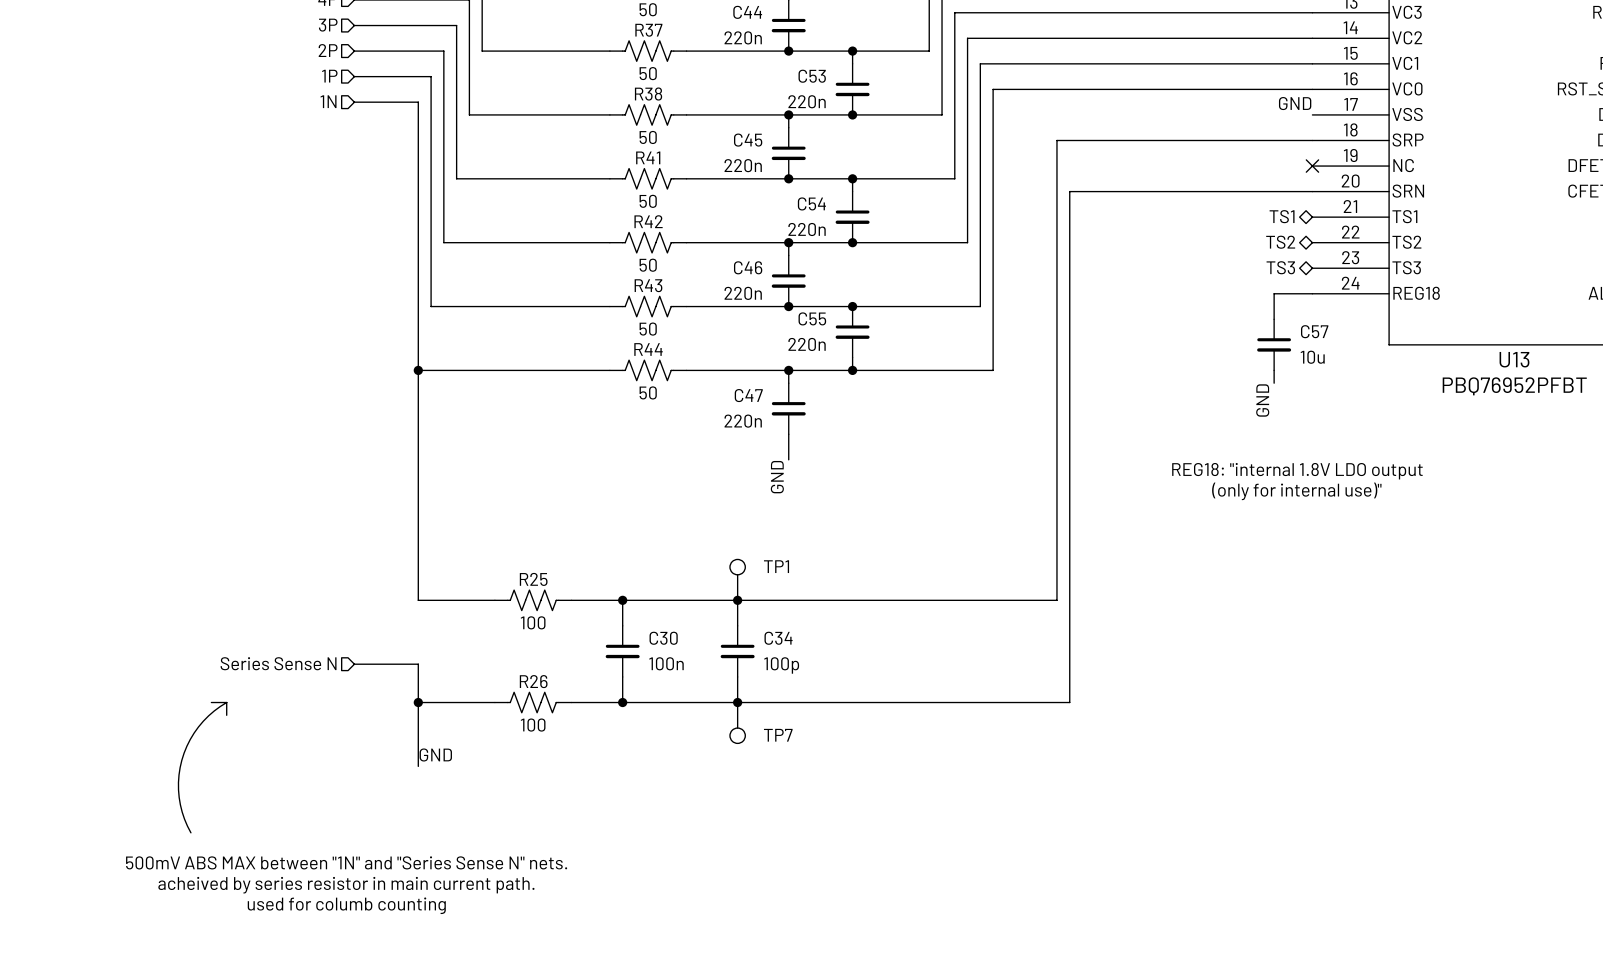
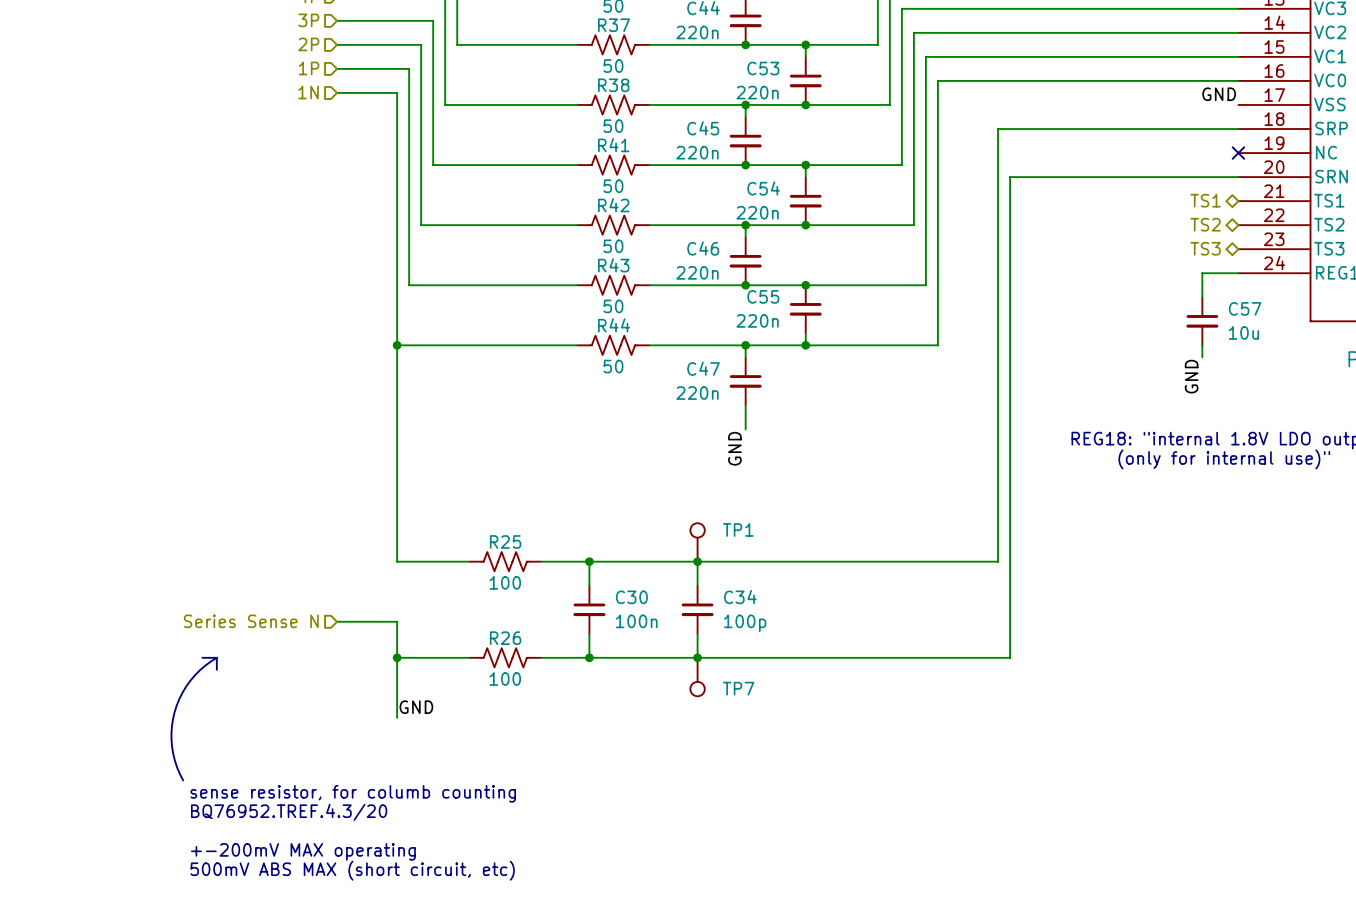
text: none -> sense resistor, for columb counting (353, 793)
text: 500mV ABS MAX between "1N" and "Series Sense N" nets. (346, 862) -> none
text: none -> BQ76952.TREF.4.3/20 (289, 812)
text: acheived by series resistor in main current path. (346, 885) -> none
text: used for columb counting (346, 905) -> none
text: none -> +-200mV MAX operating (303, 851)
text: none -> 500mV ABS MAX (short circuit, etc) (352, 870)

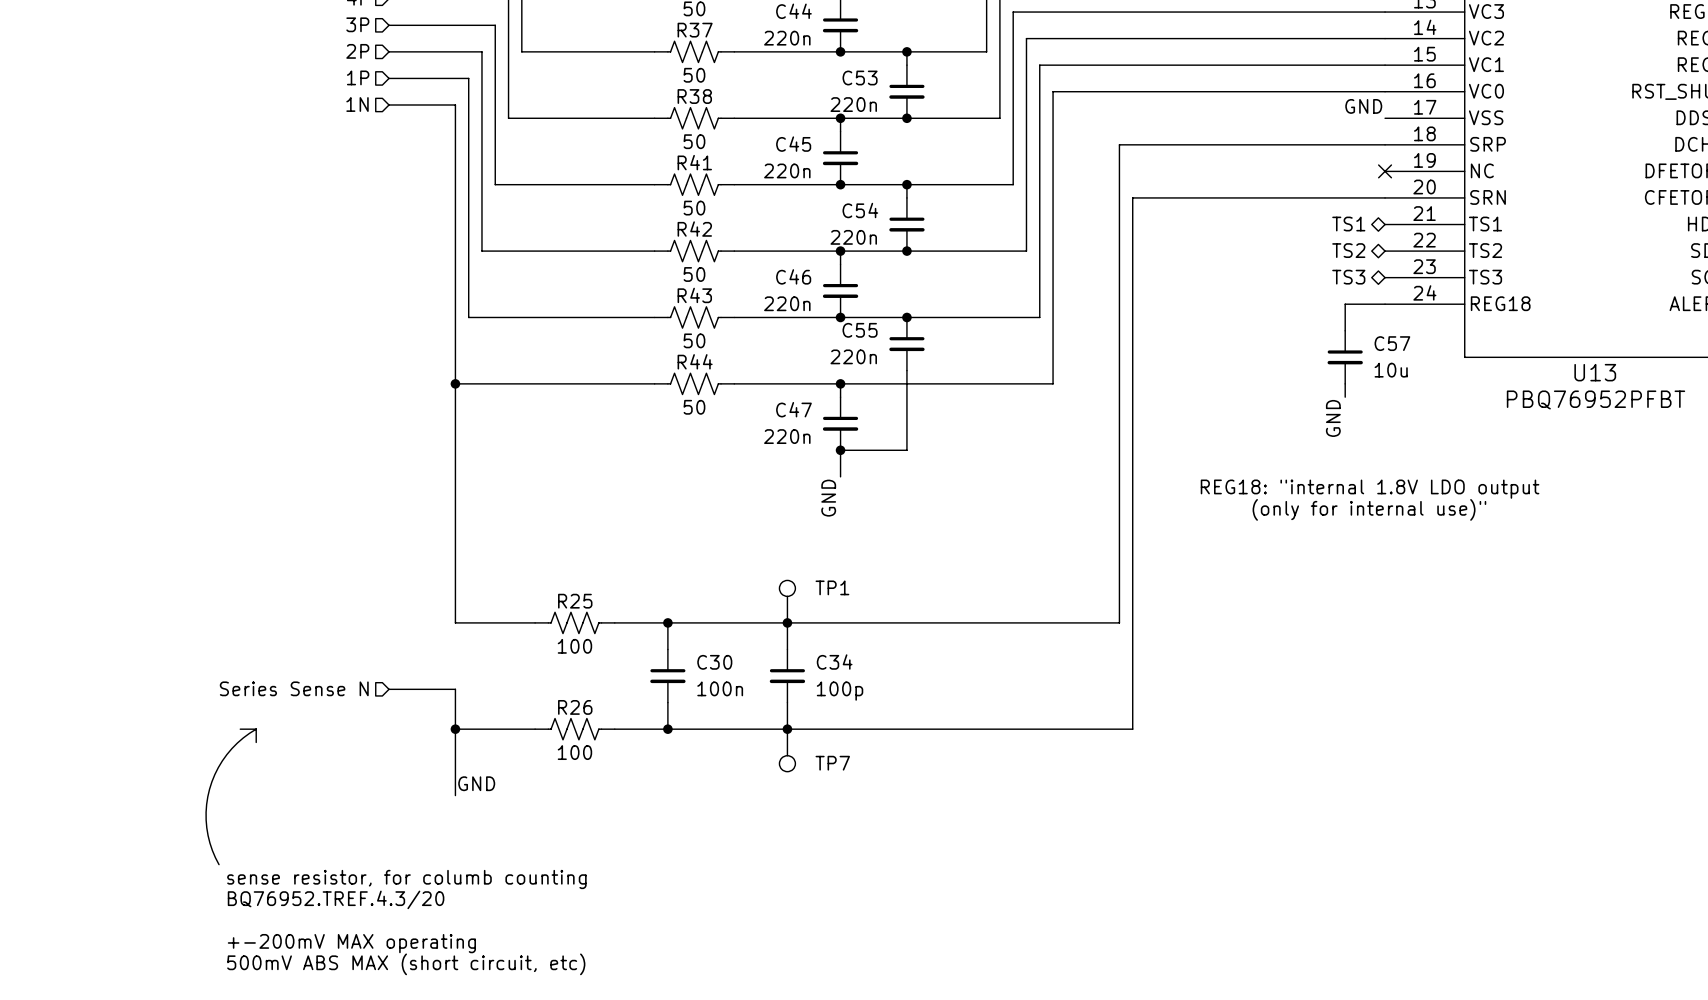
wire: none -> (906, 383) (906, 450) (840, 450)
junction: (805, 345) -> none
junction: none -> (840, 450)

